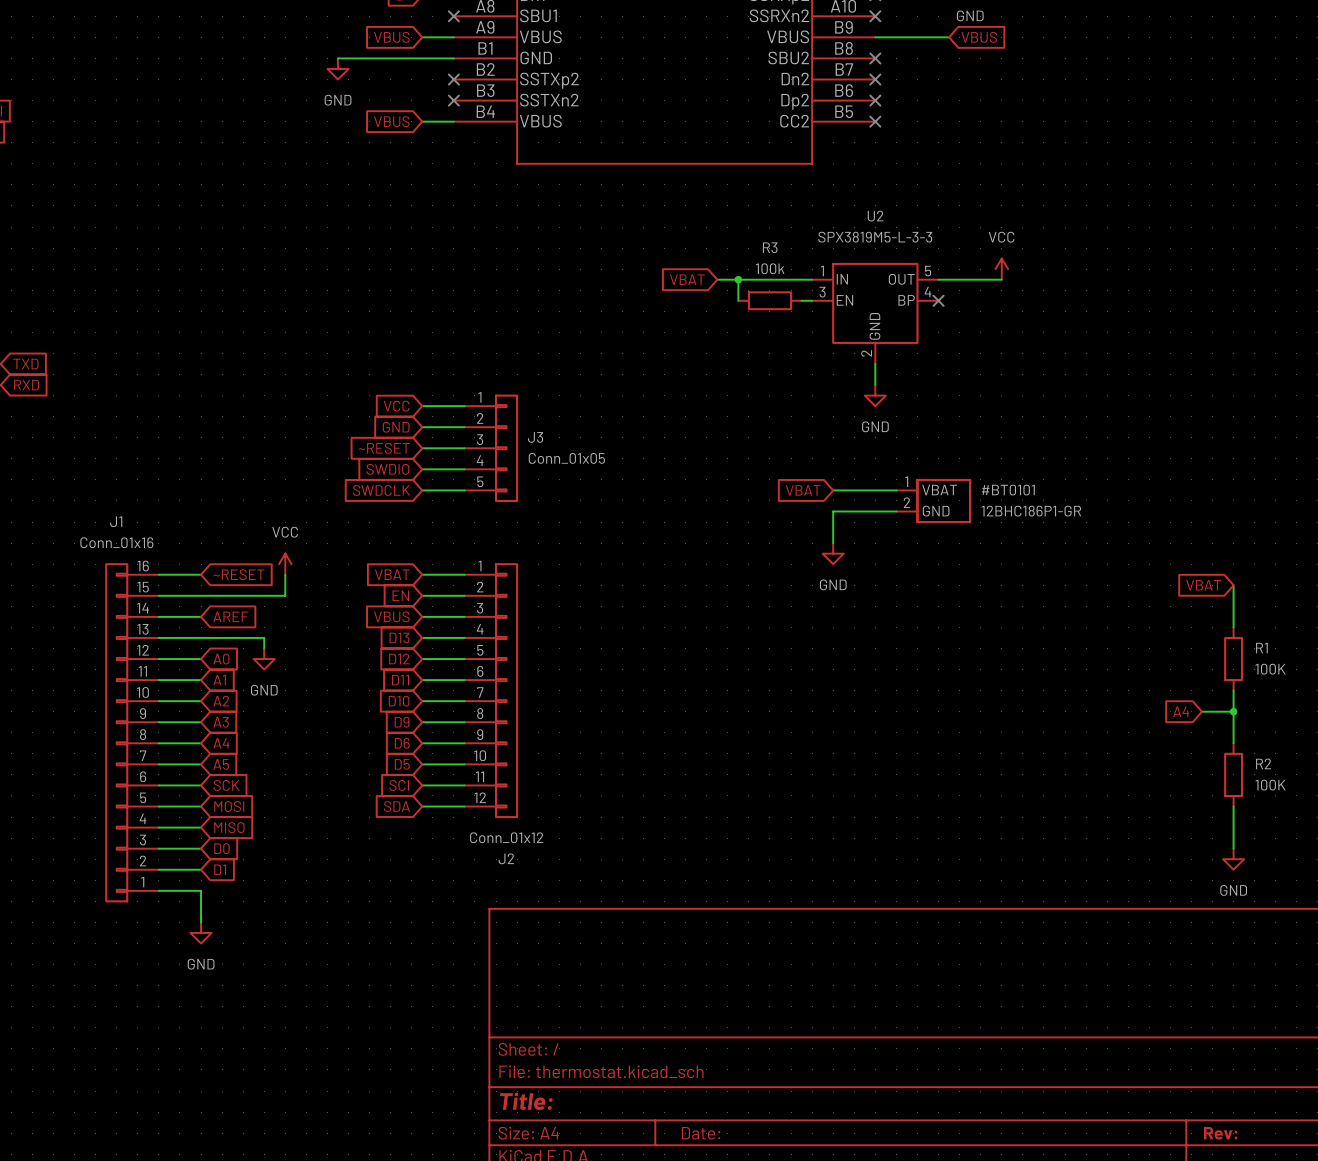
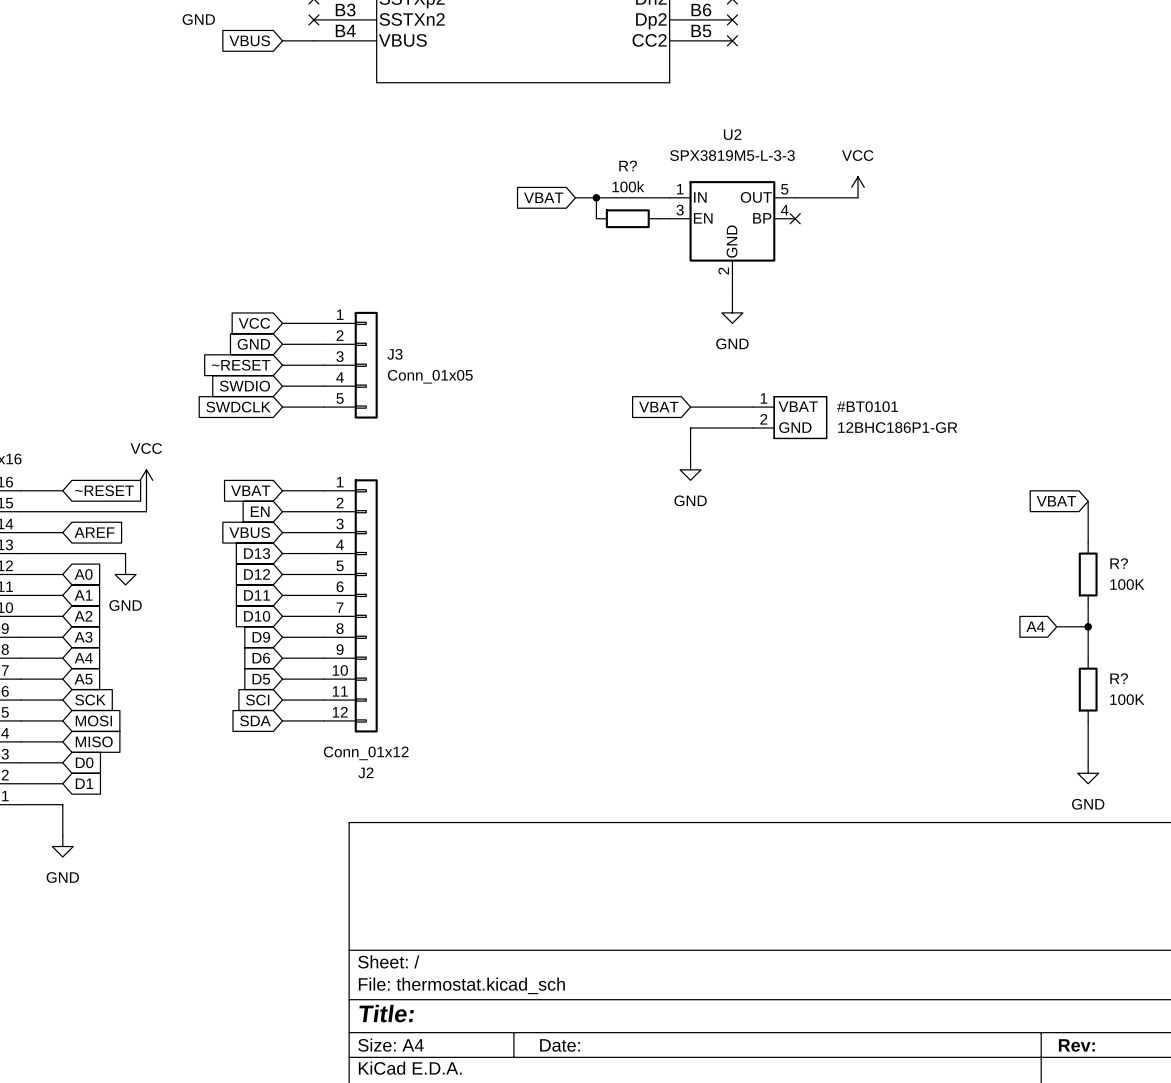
R3 name: R3 (770, 247) -> R? (628, 165)
R1 name: R1 (1261, 648) -> R? (1119, 563)
R2 name: R2 (1263, 763) -> R? (1119, 678)

